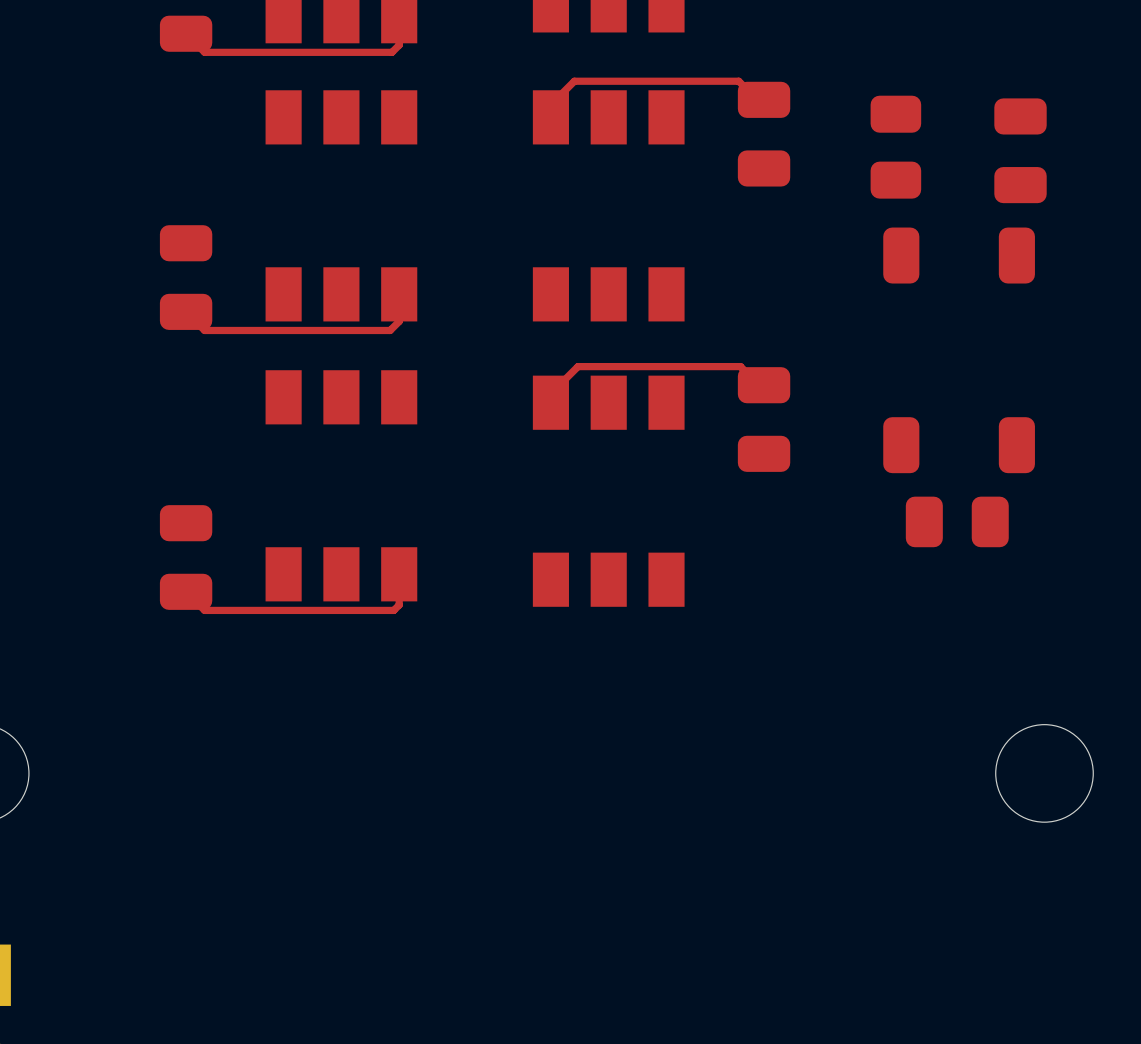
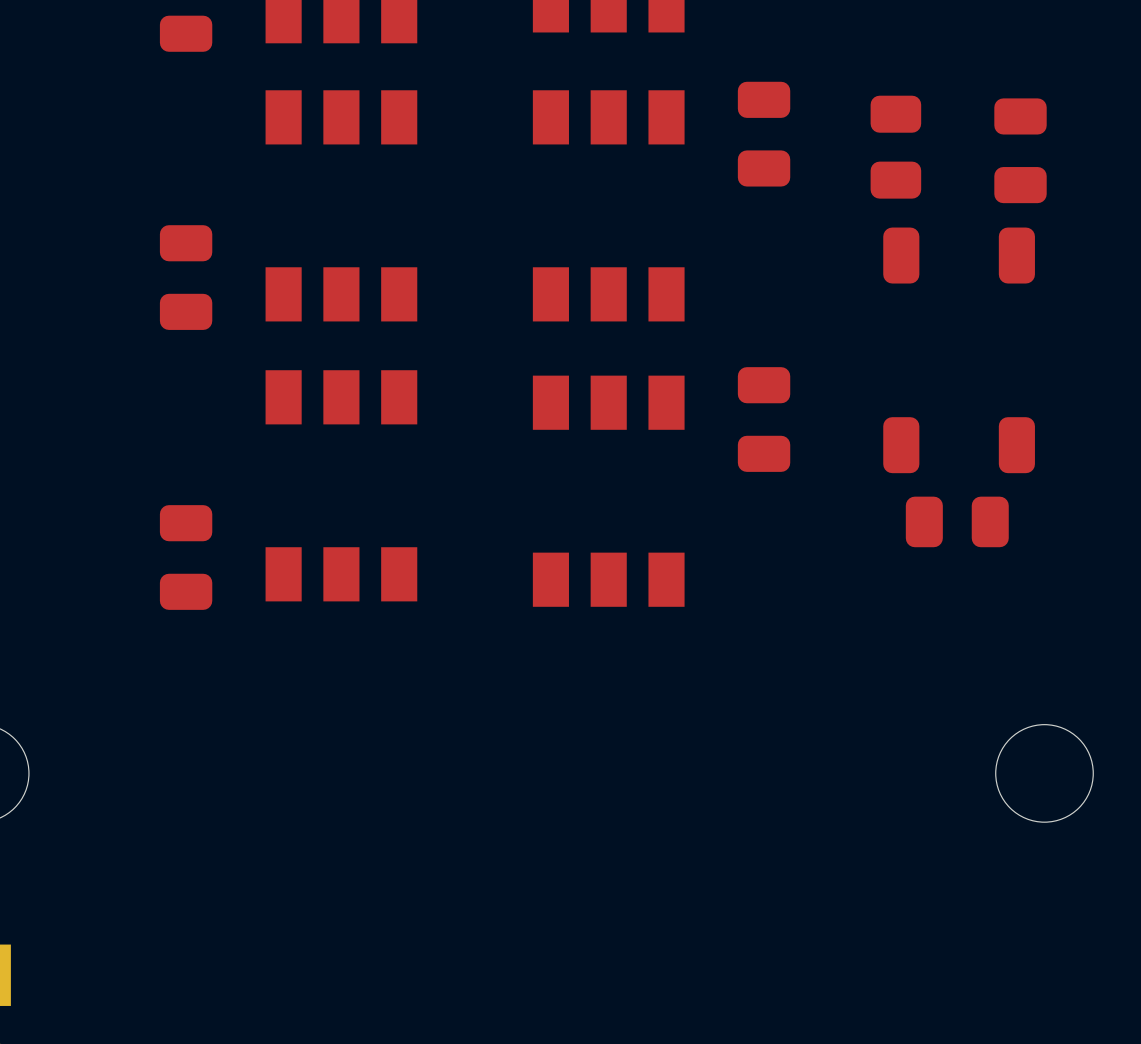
top track: (399, 16) (399, 45) (391, 52) (204, 52) (186, 33) -> none
top track: (764, 106) (738, 81) (574, 81) (550, 104) (550, 117) -> none
top track: (399, 294) (399, 321) (390, 330) (204, 330) (186, 311) -> none
top track: (764, 390) (740, 366) (578, 366) (550, 393) (550, 402) -> none
top track: (399, 574) (399, 605) (393, 610) (204, 610) (186, 591) -> none

